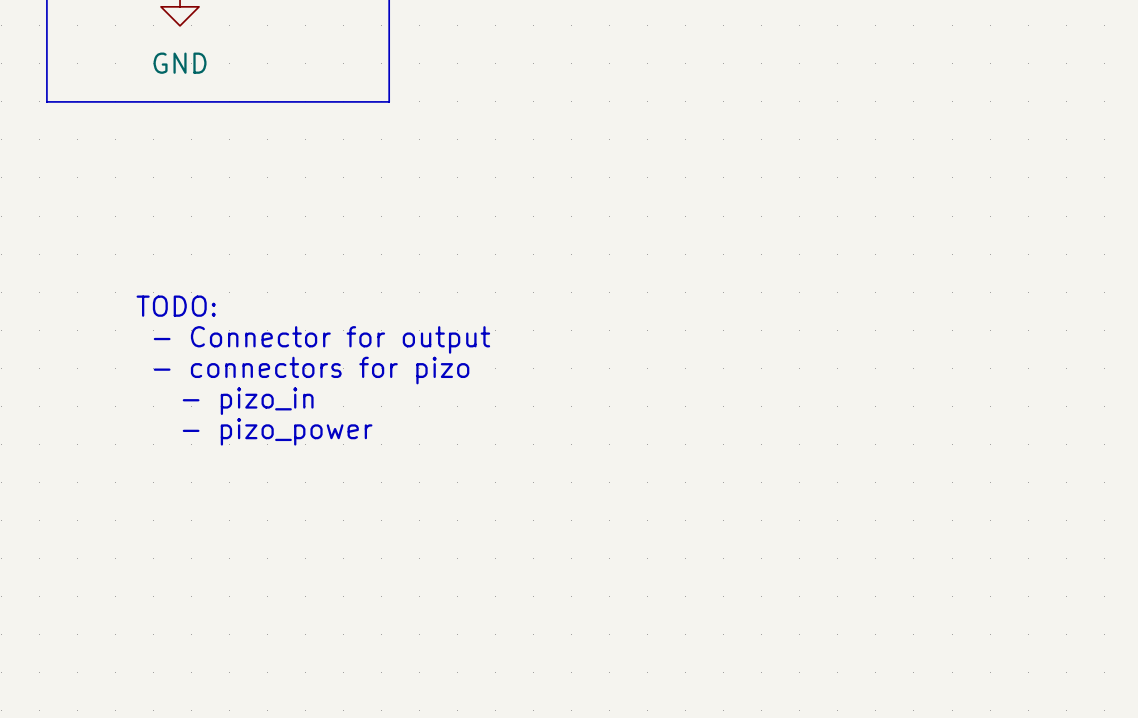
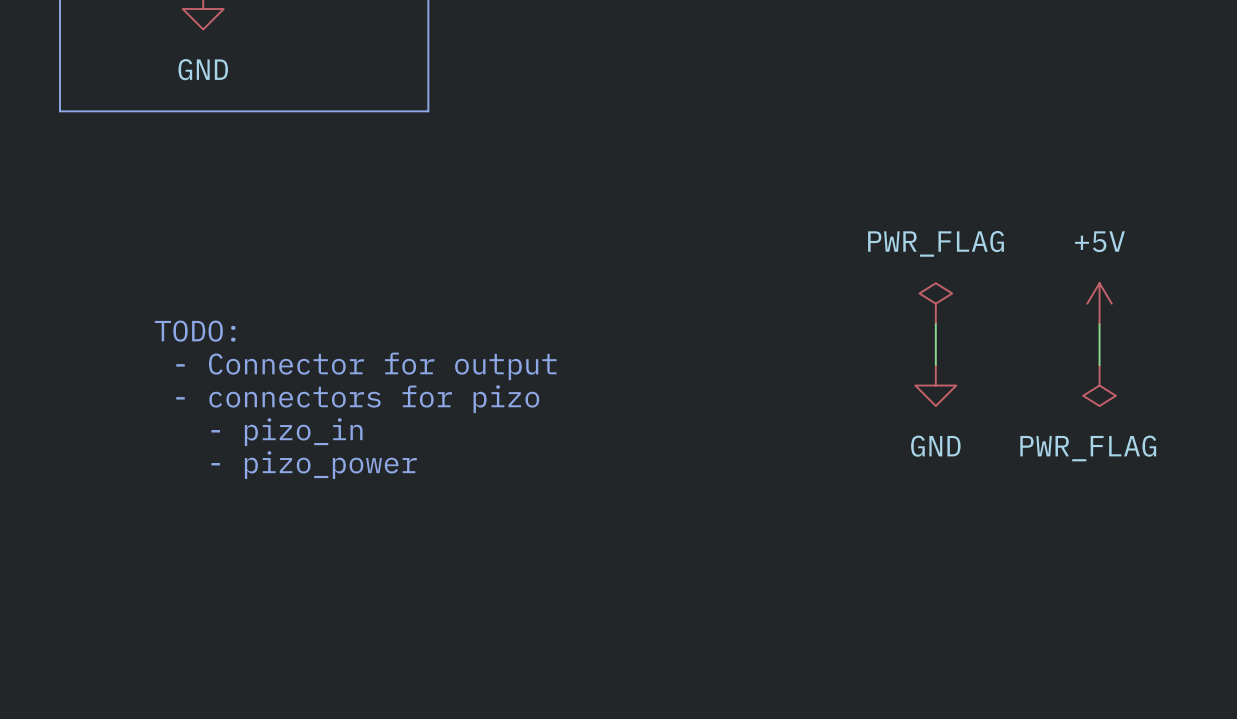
power symbol: none -> PWR_FLAG (935, 303)
power symbol: none -> +5V (1099, 303)
wire: none -> (935, 324) (935, 365)
wire: none -> (1099, 324) (1099, 365)
power symbol: none -> GND (935, 385)
power symbol: none -> PWR_FLAG (1099, 385)

